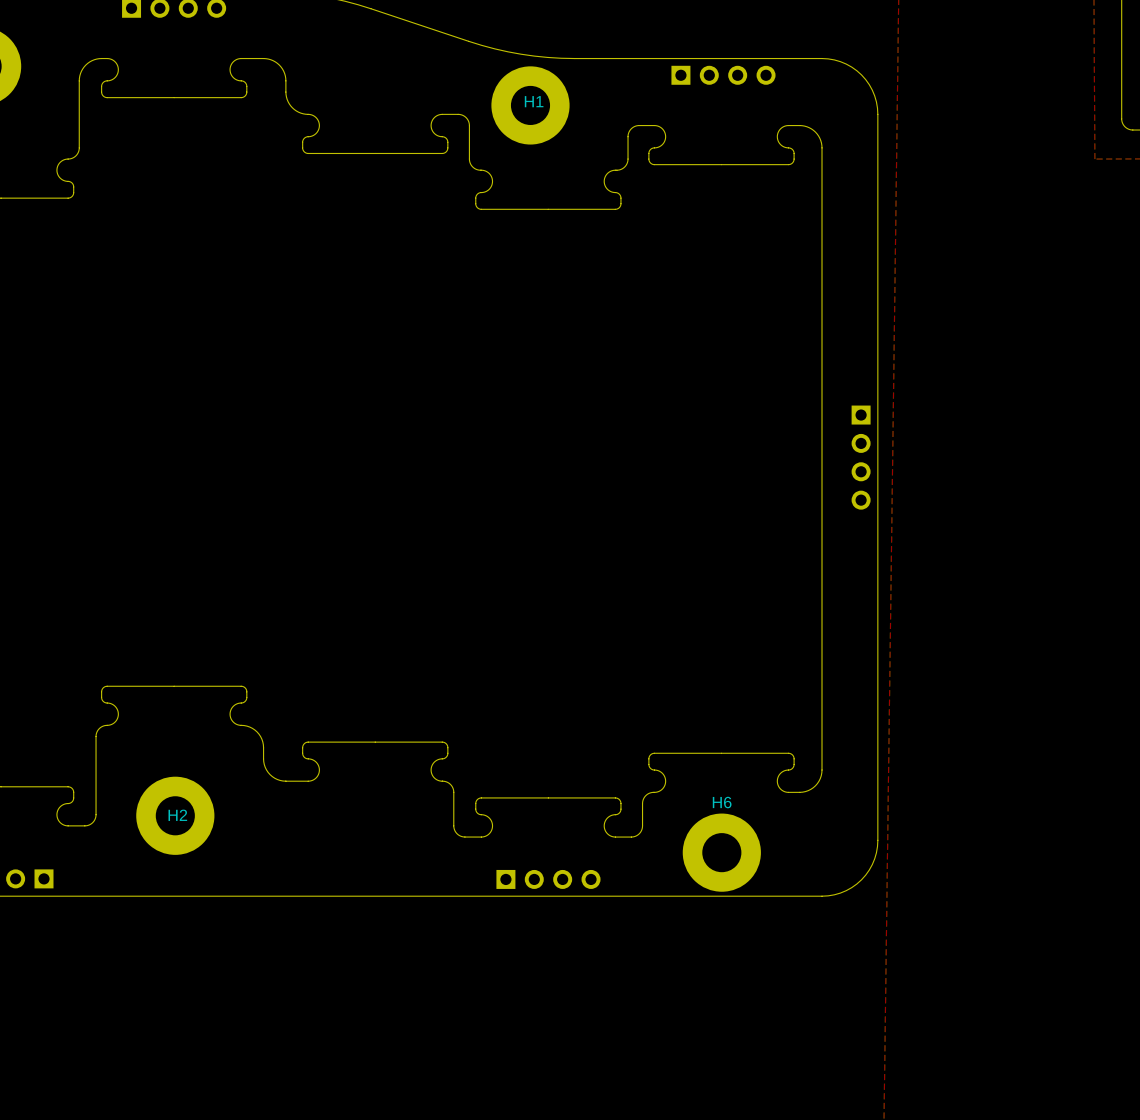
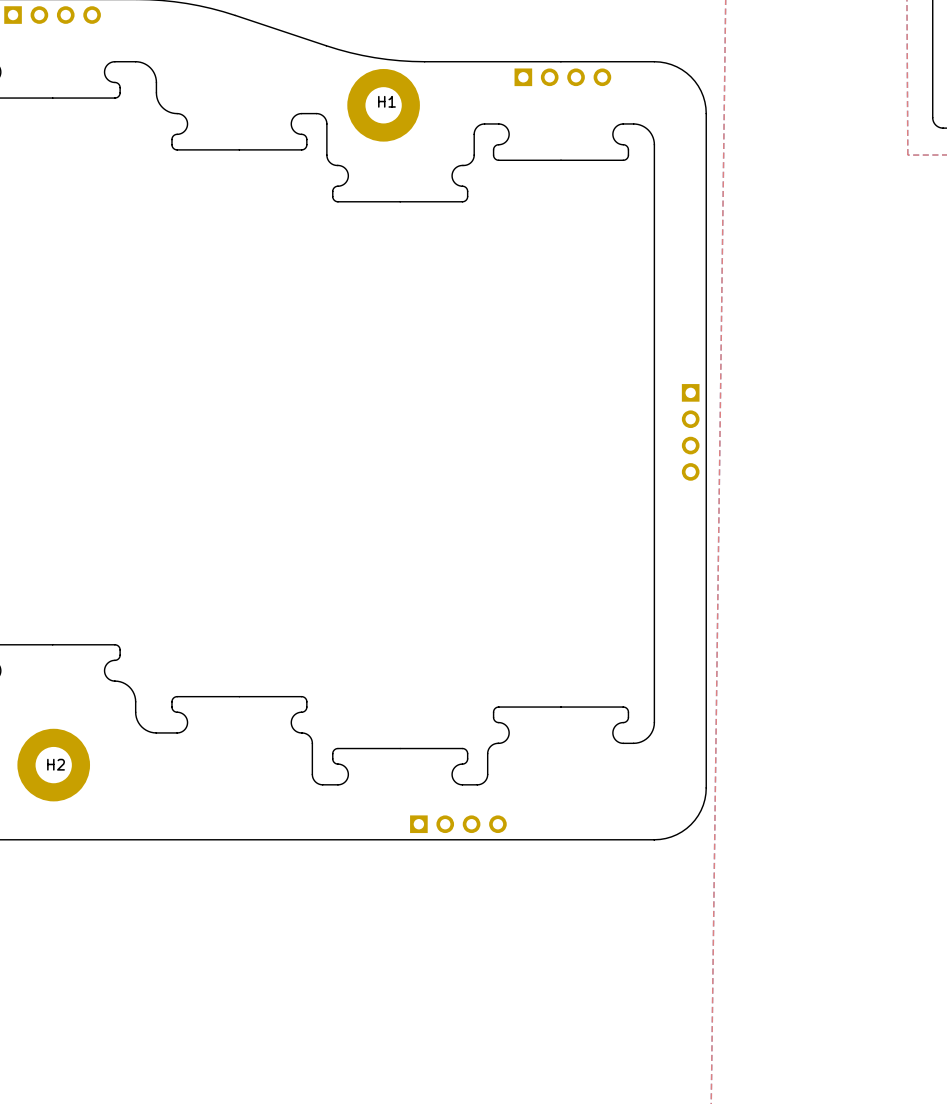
H6: (721, 852) -> none
part position: (548, 879) -> (458, 824)

